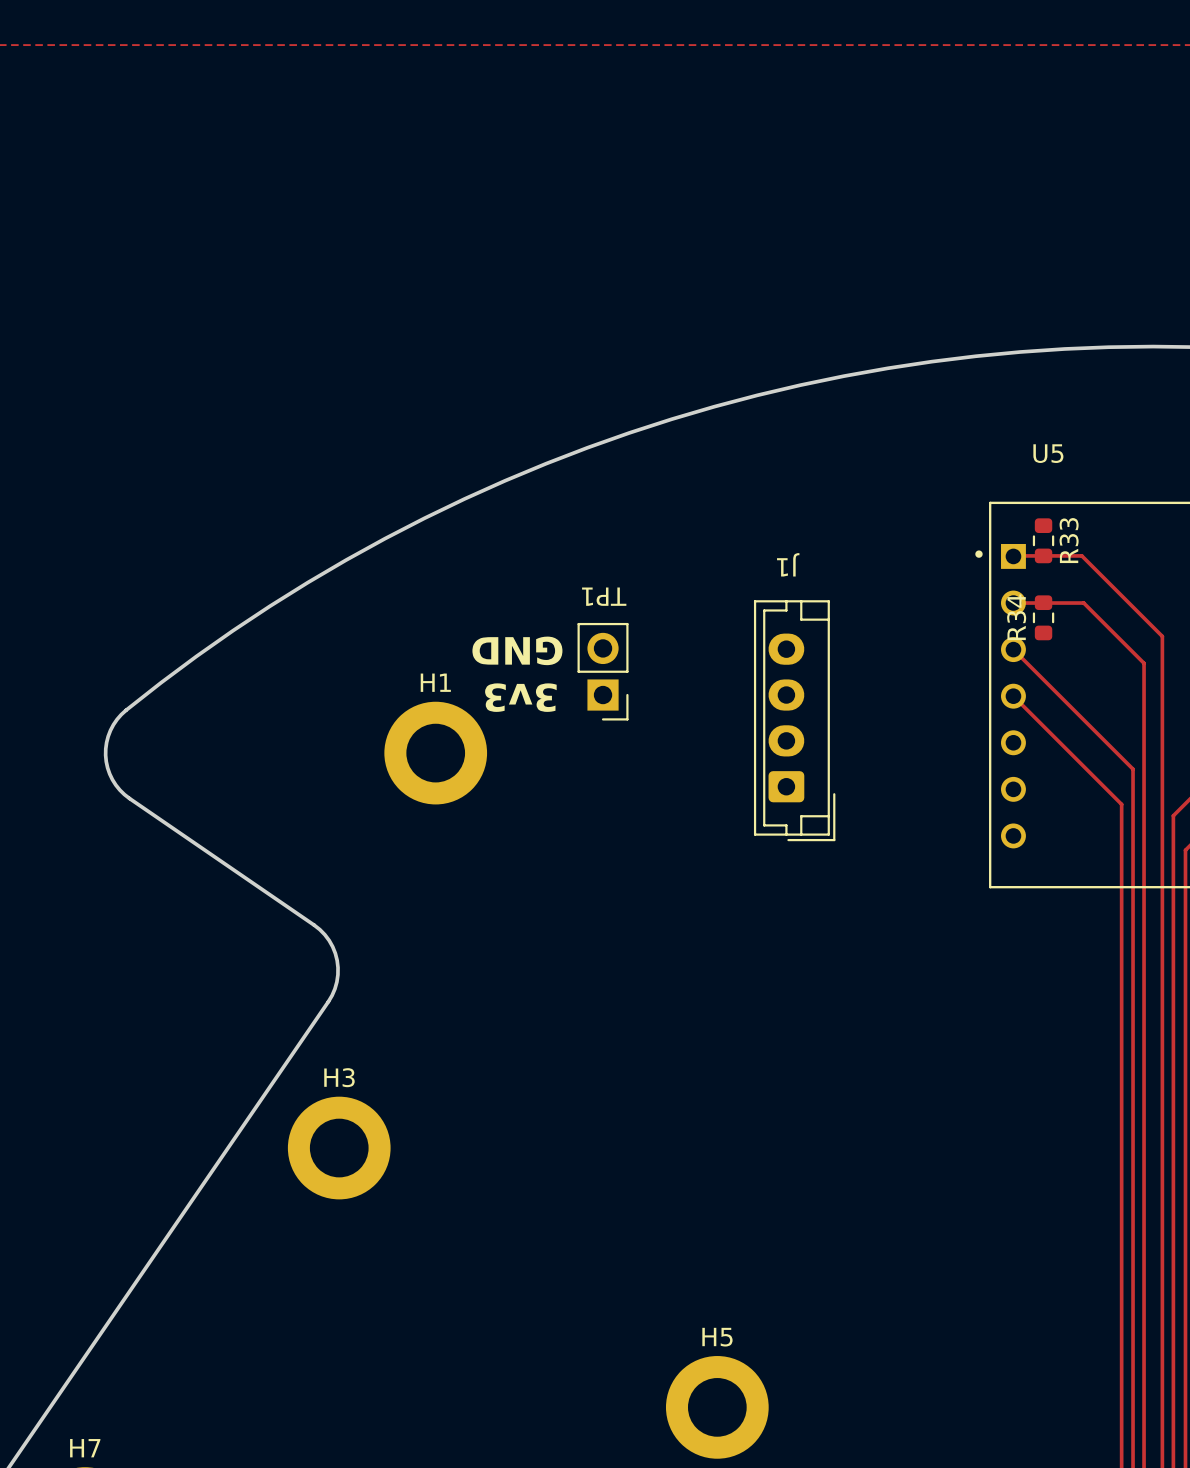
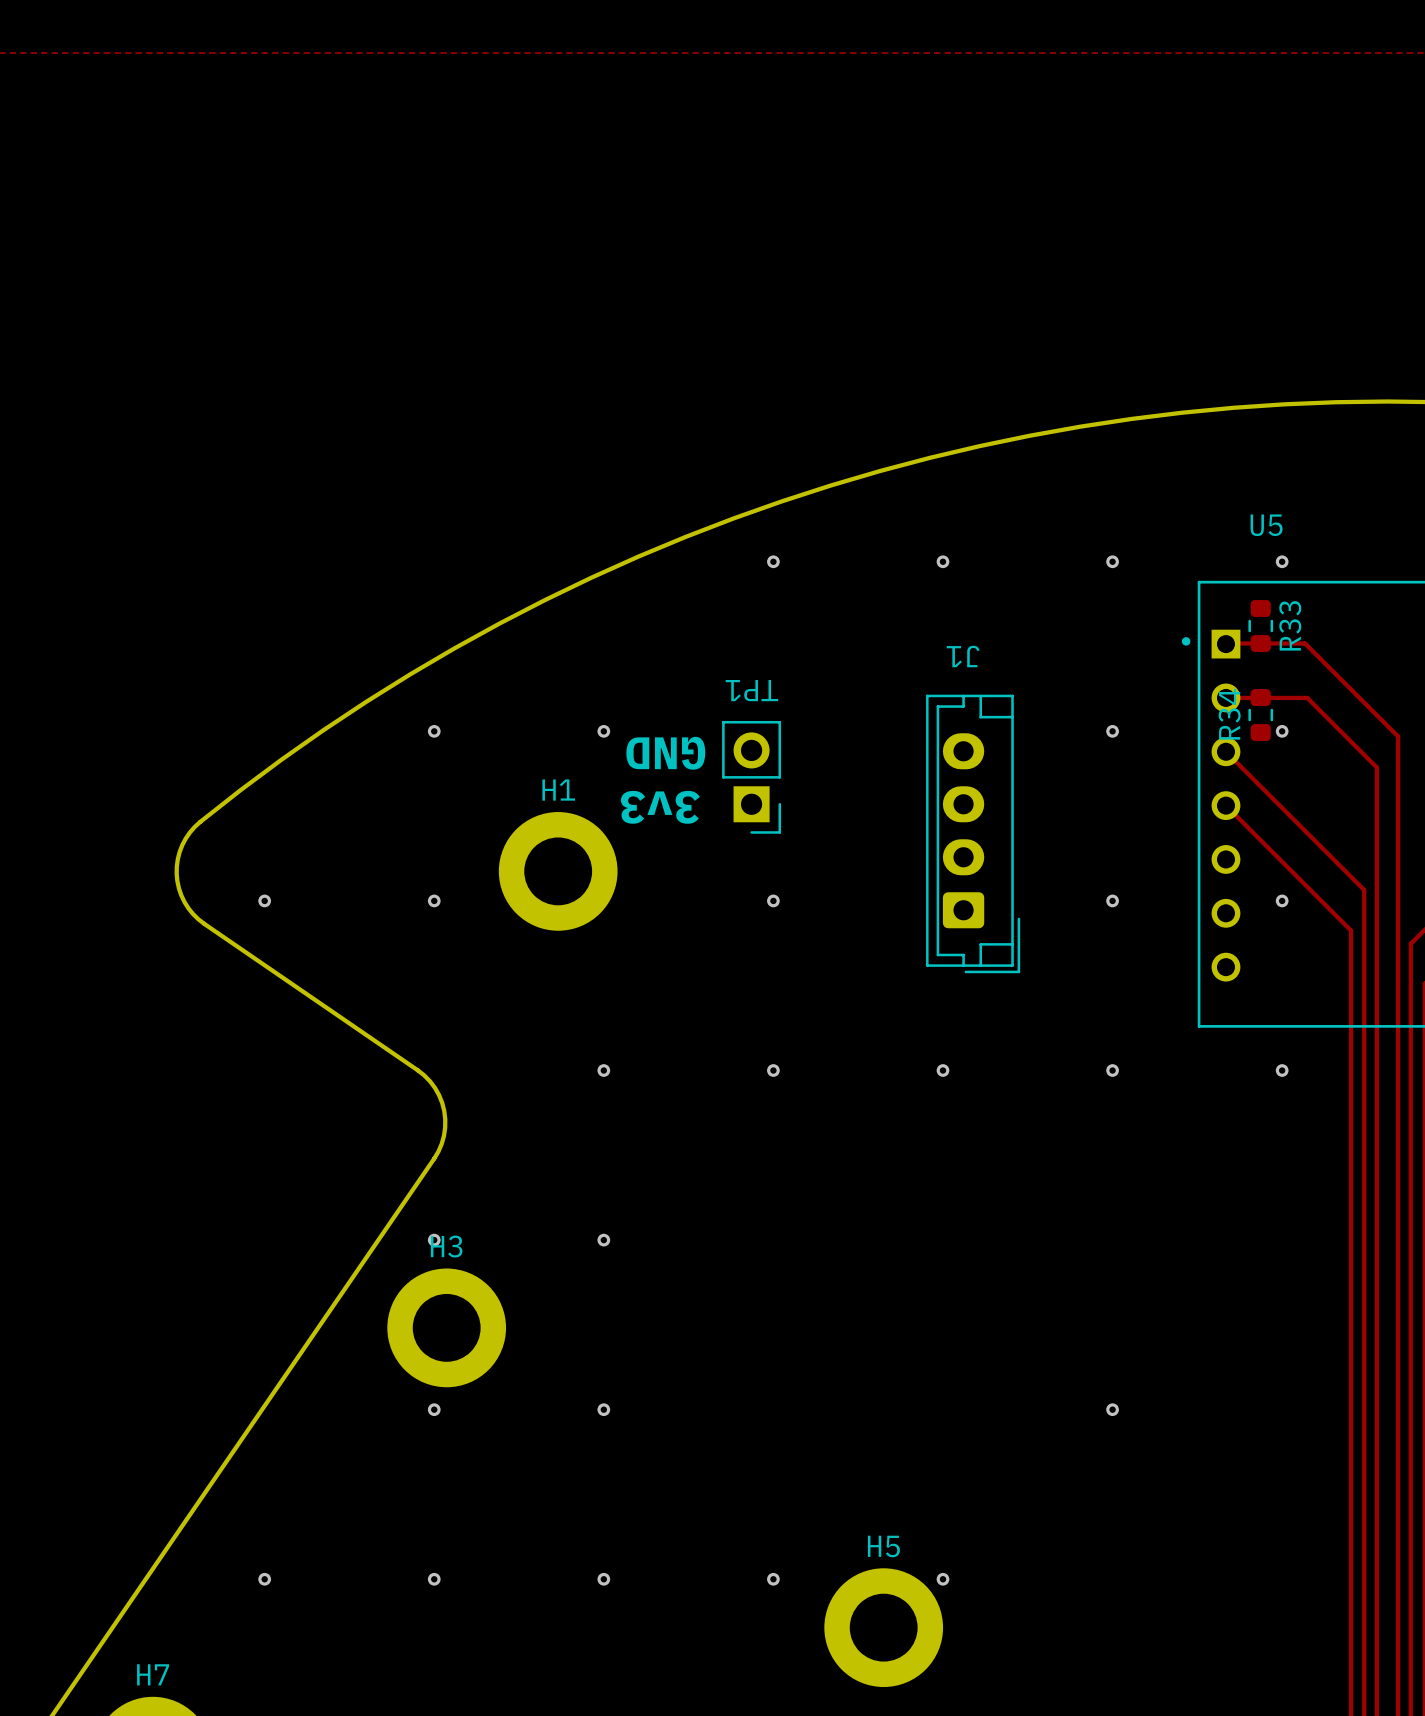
via: none -> (773, 561)
via: none -> (942, 561)
via: none -> (1112, 561)
via: none -> (1282, 561)
via: none -> (434, 731)
via: none -> (603, 731)
via: none -> (1112, 731)
via: none -> (1282, 731)
via: none -> (264, 900)
via: none -> (434, 900)
via: none -> (773, 900)
via: none -> (1112, 900)
via: none -> (1282, 900)
via: none -> (603, 1070)
via: none -> (773, 1070)
via: none -> (942, 1070)
via: none -> (1112, 1070)
via: none -> (1282, 1070)
via: none -> (434, 1240)
via: none -> (603, 1240)
via: none -> (434, 1409)
via: none -> (603, 1409)
via: none -> (1112, 1409)
via: none -> (264, 1579)
via: none -> (434, 1579)
via: none -> (603, 1579)
via: none -> (773, 1579)
via: none -> (942, 1579)

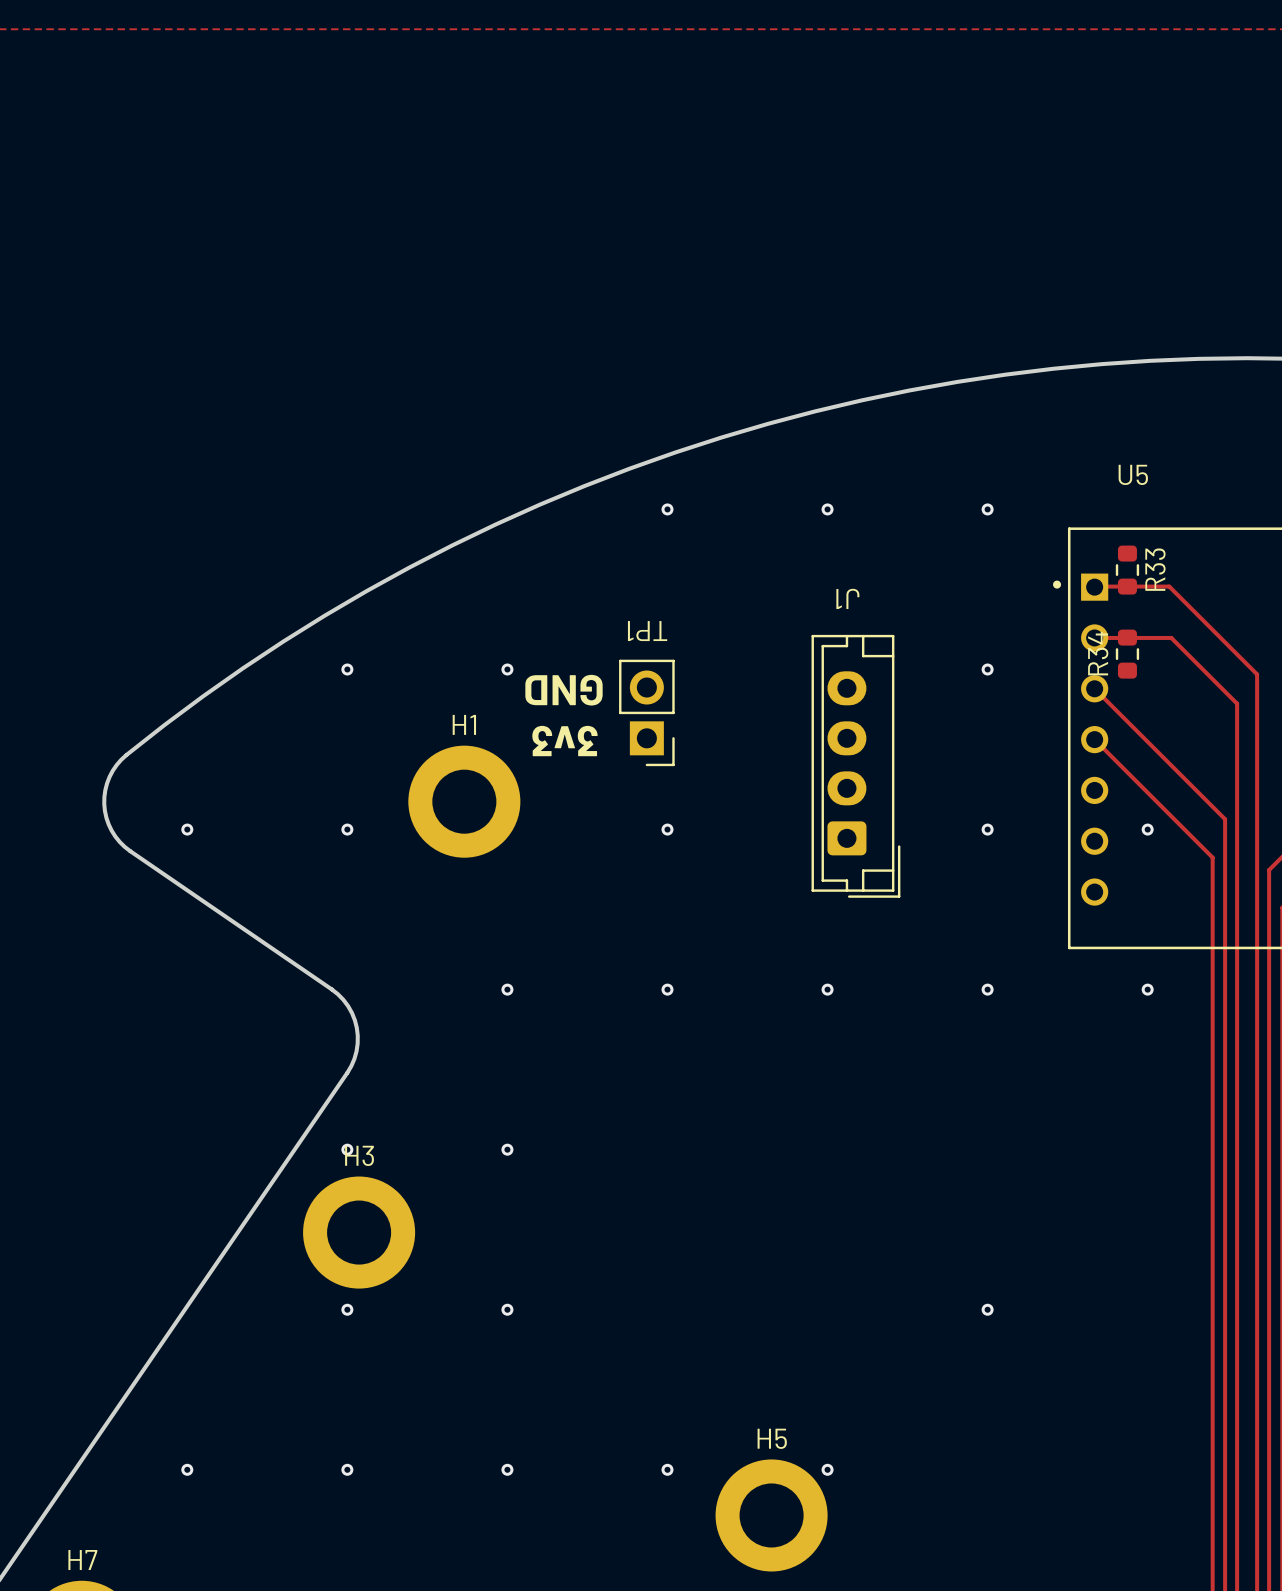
via: (1282, 561) -> none
via: (1282, 731) -> none

